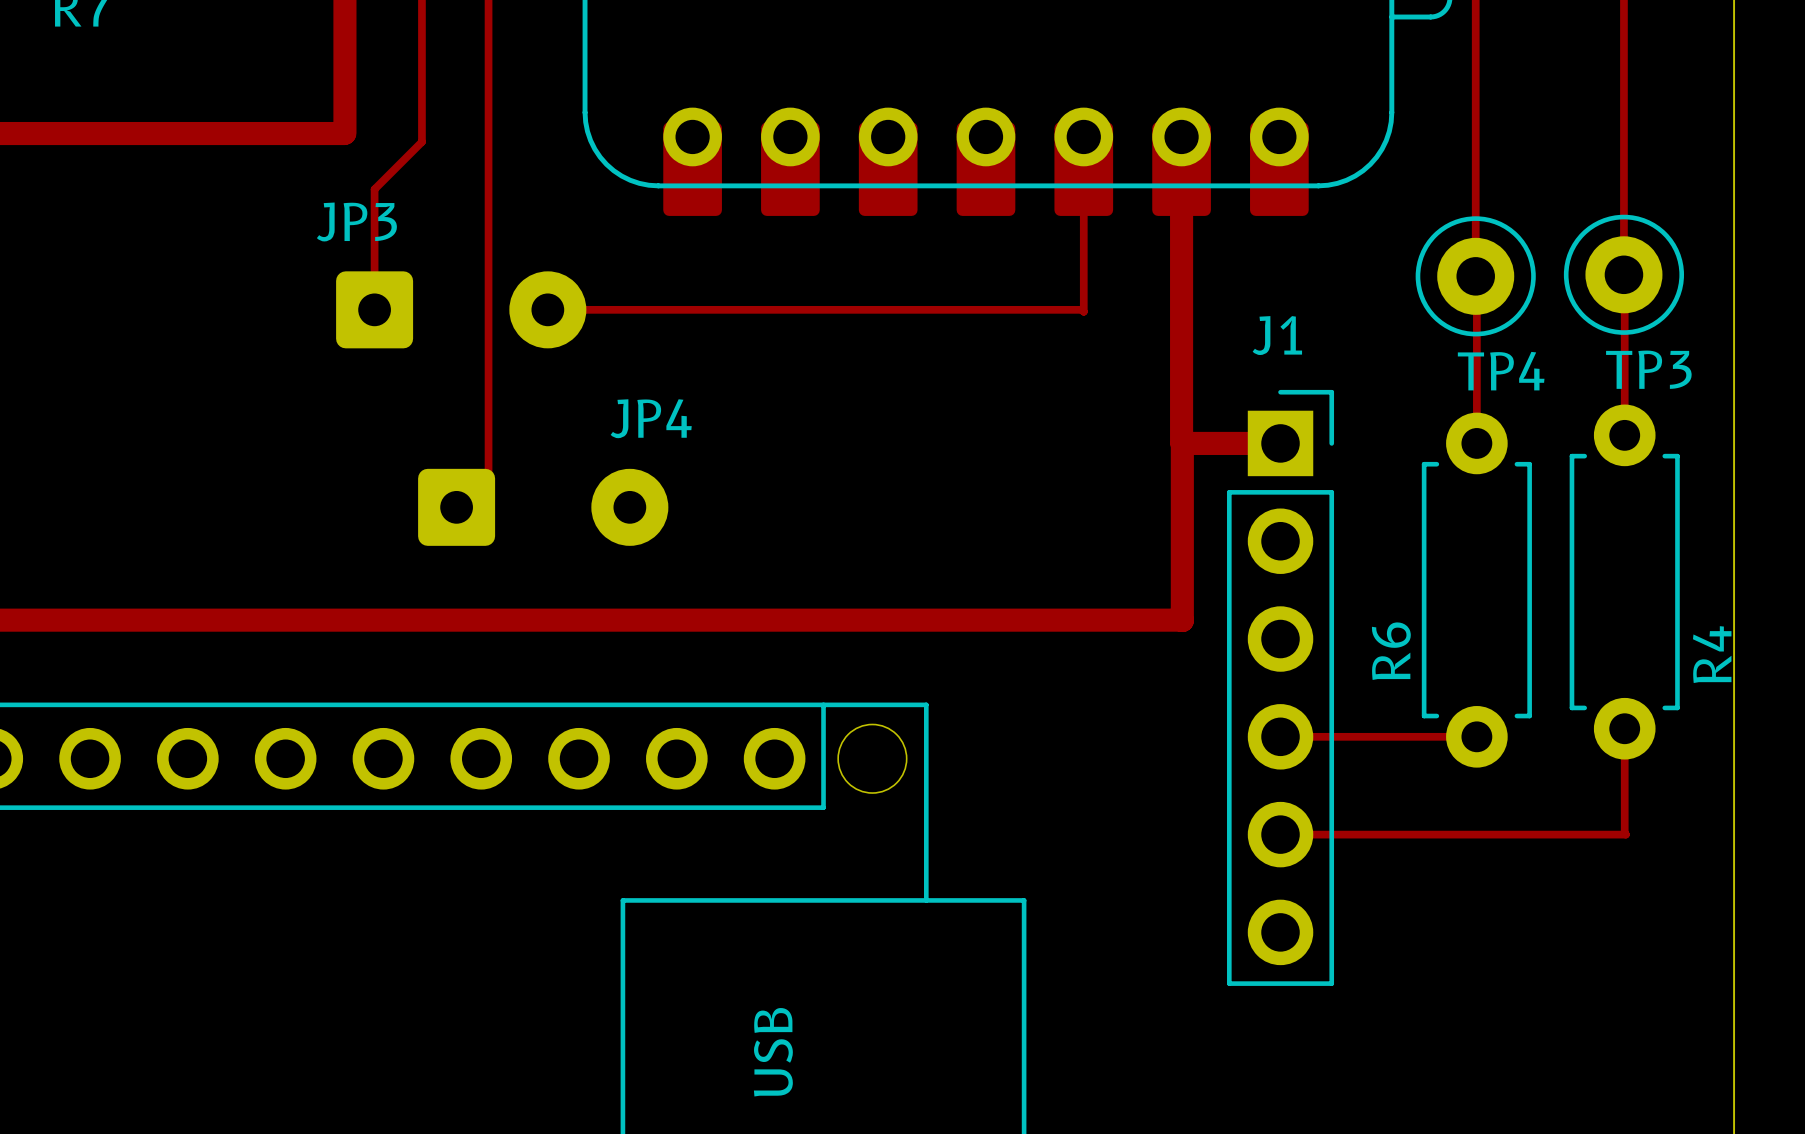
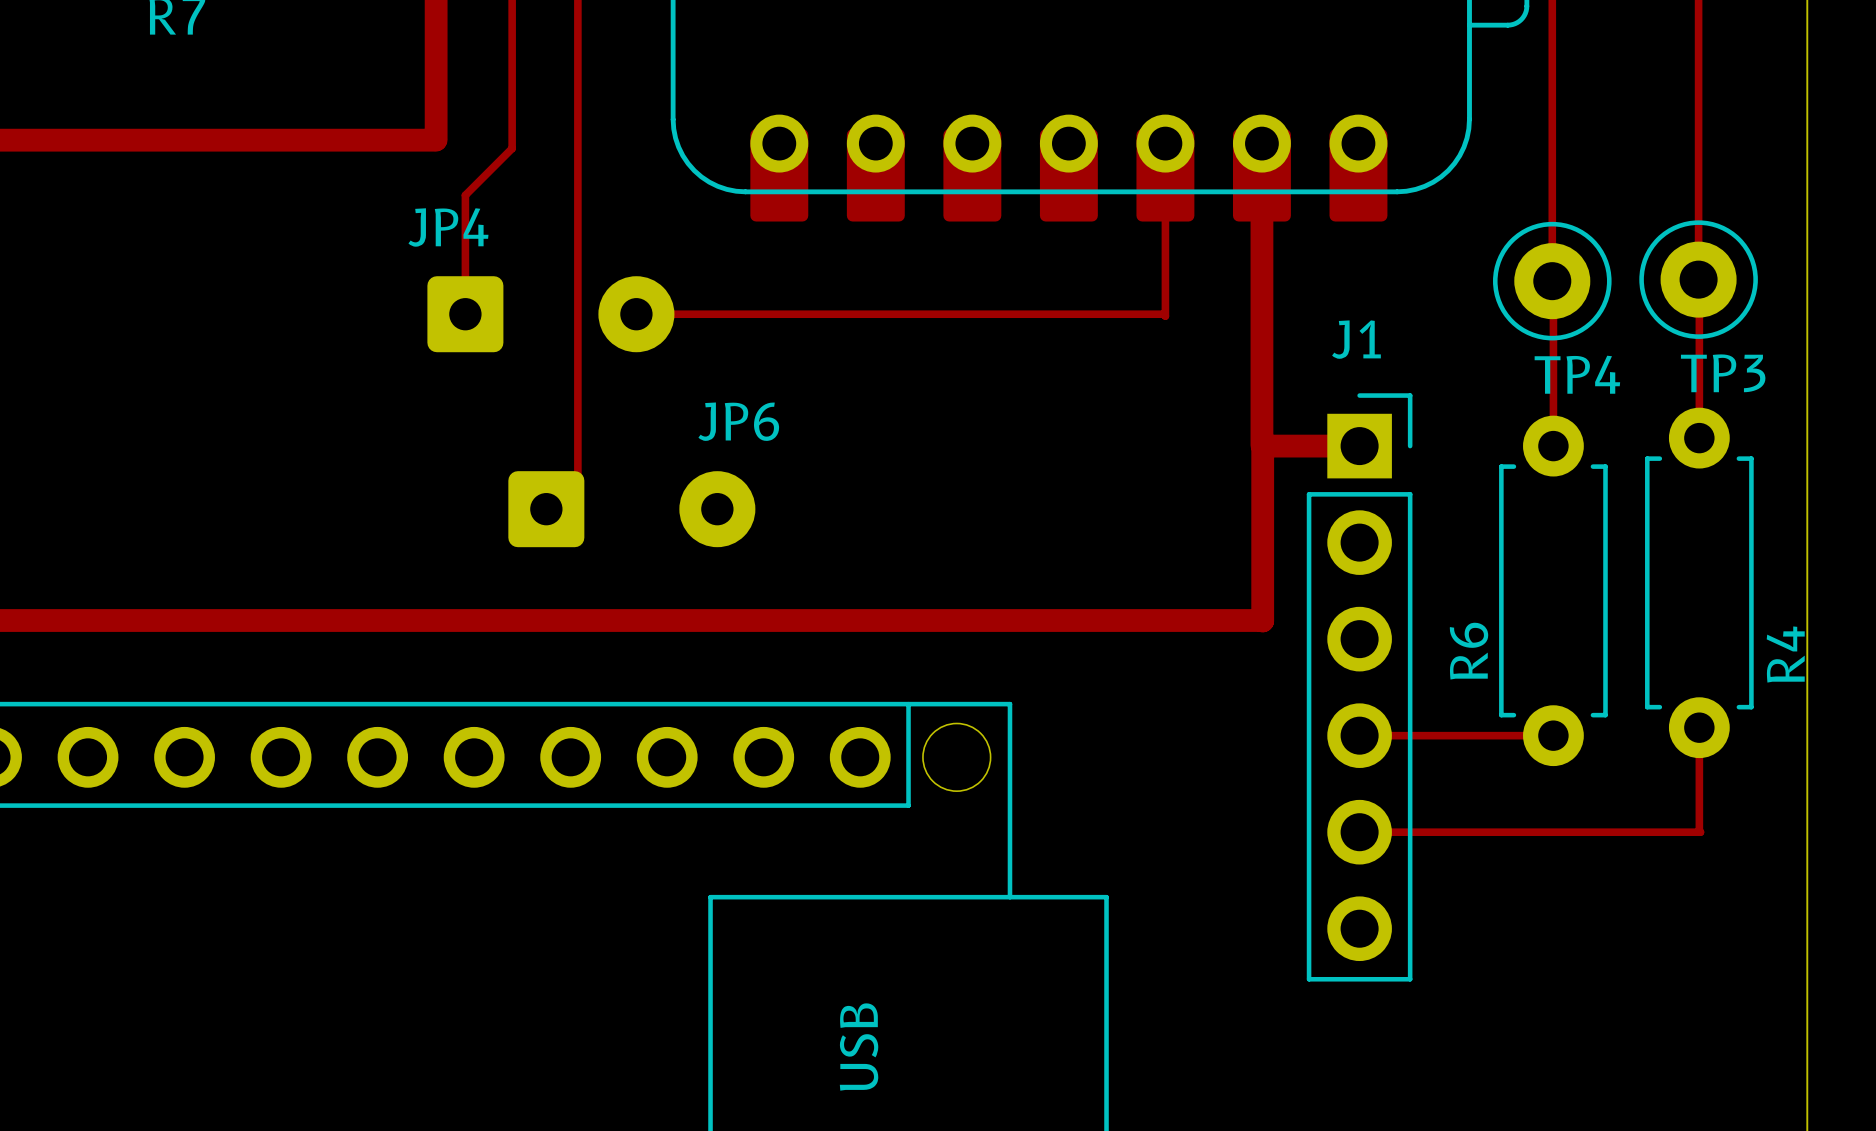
JP3 name: JP3 (356, 221) -> JP4 (448, 227)
JP4 name: JP4 (651, 418) -> JP6 (738, 421)

